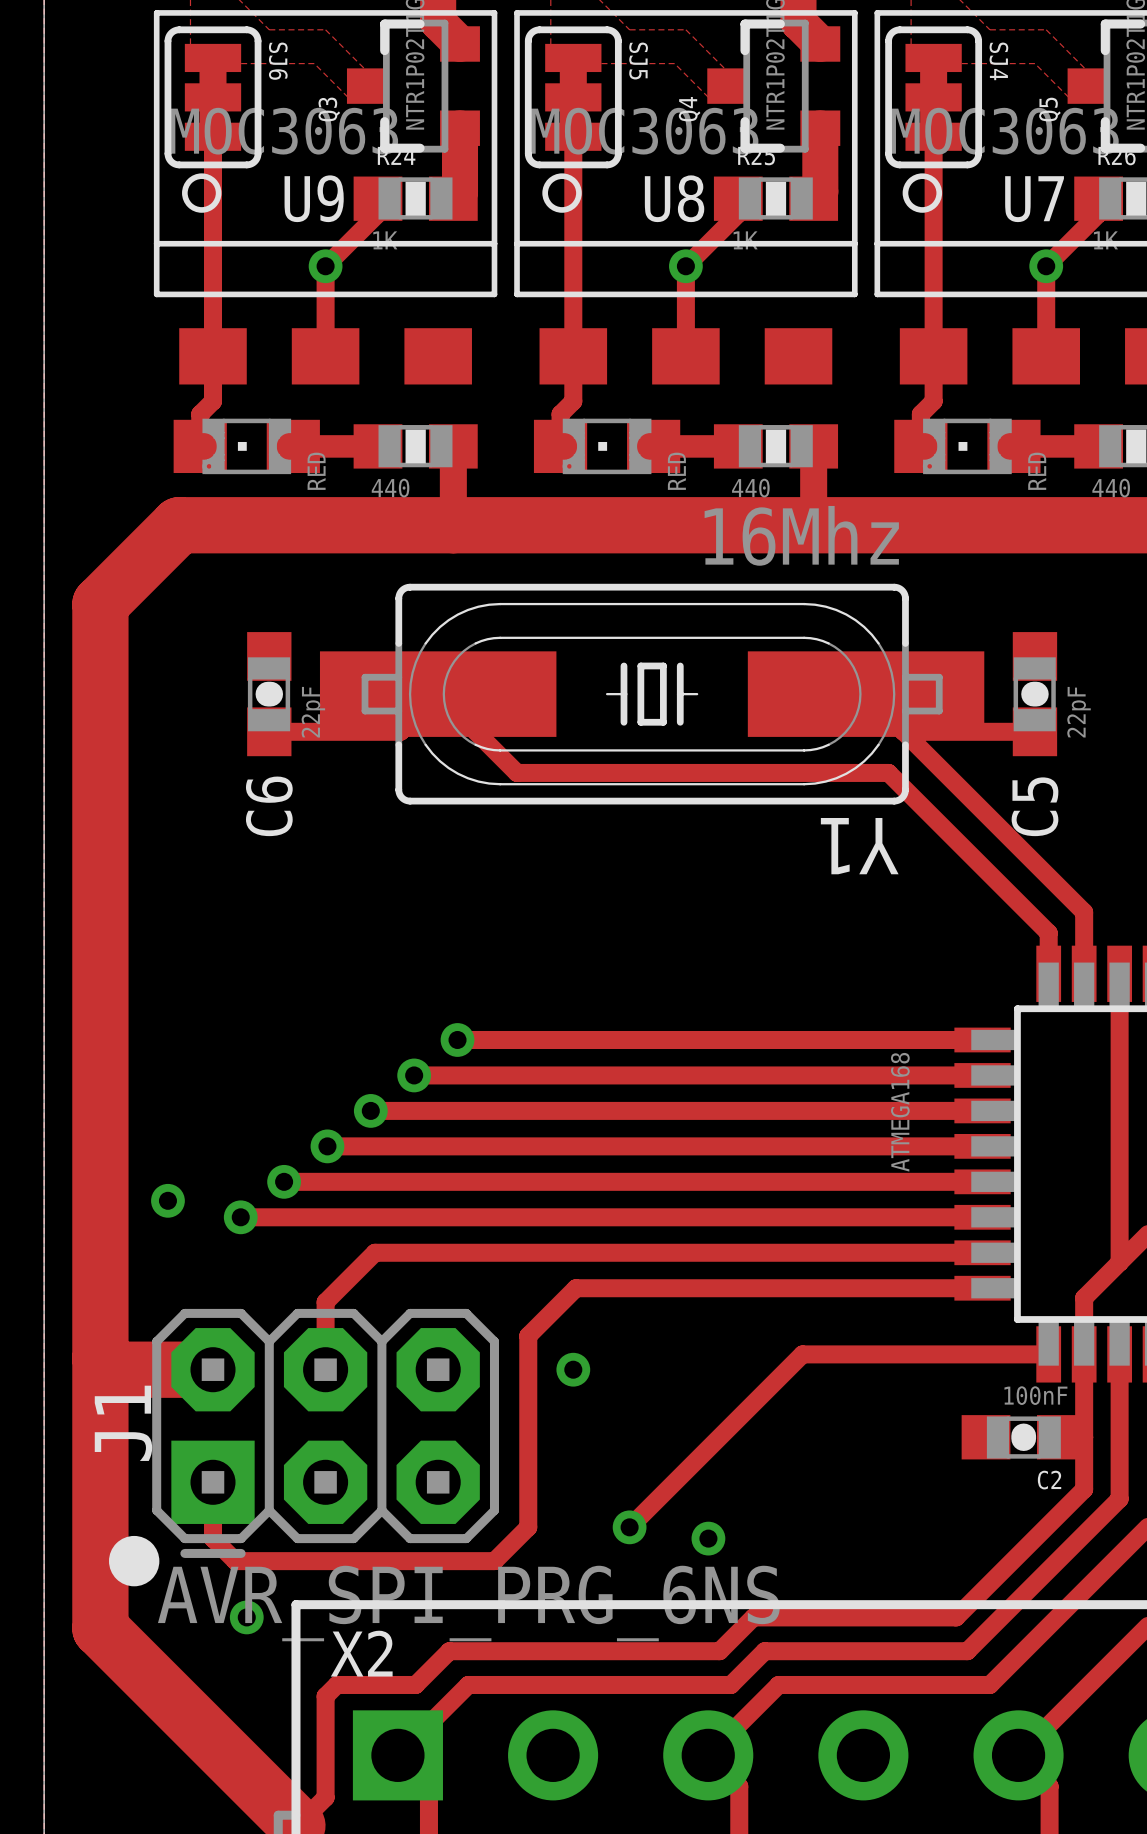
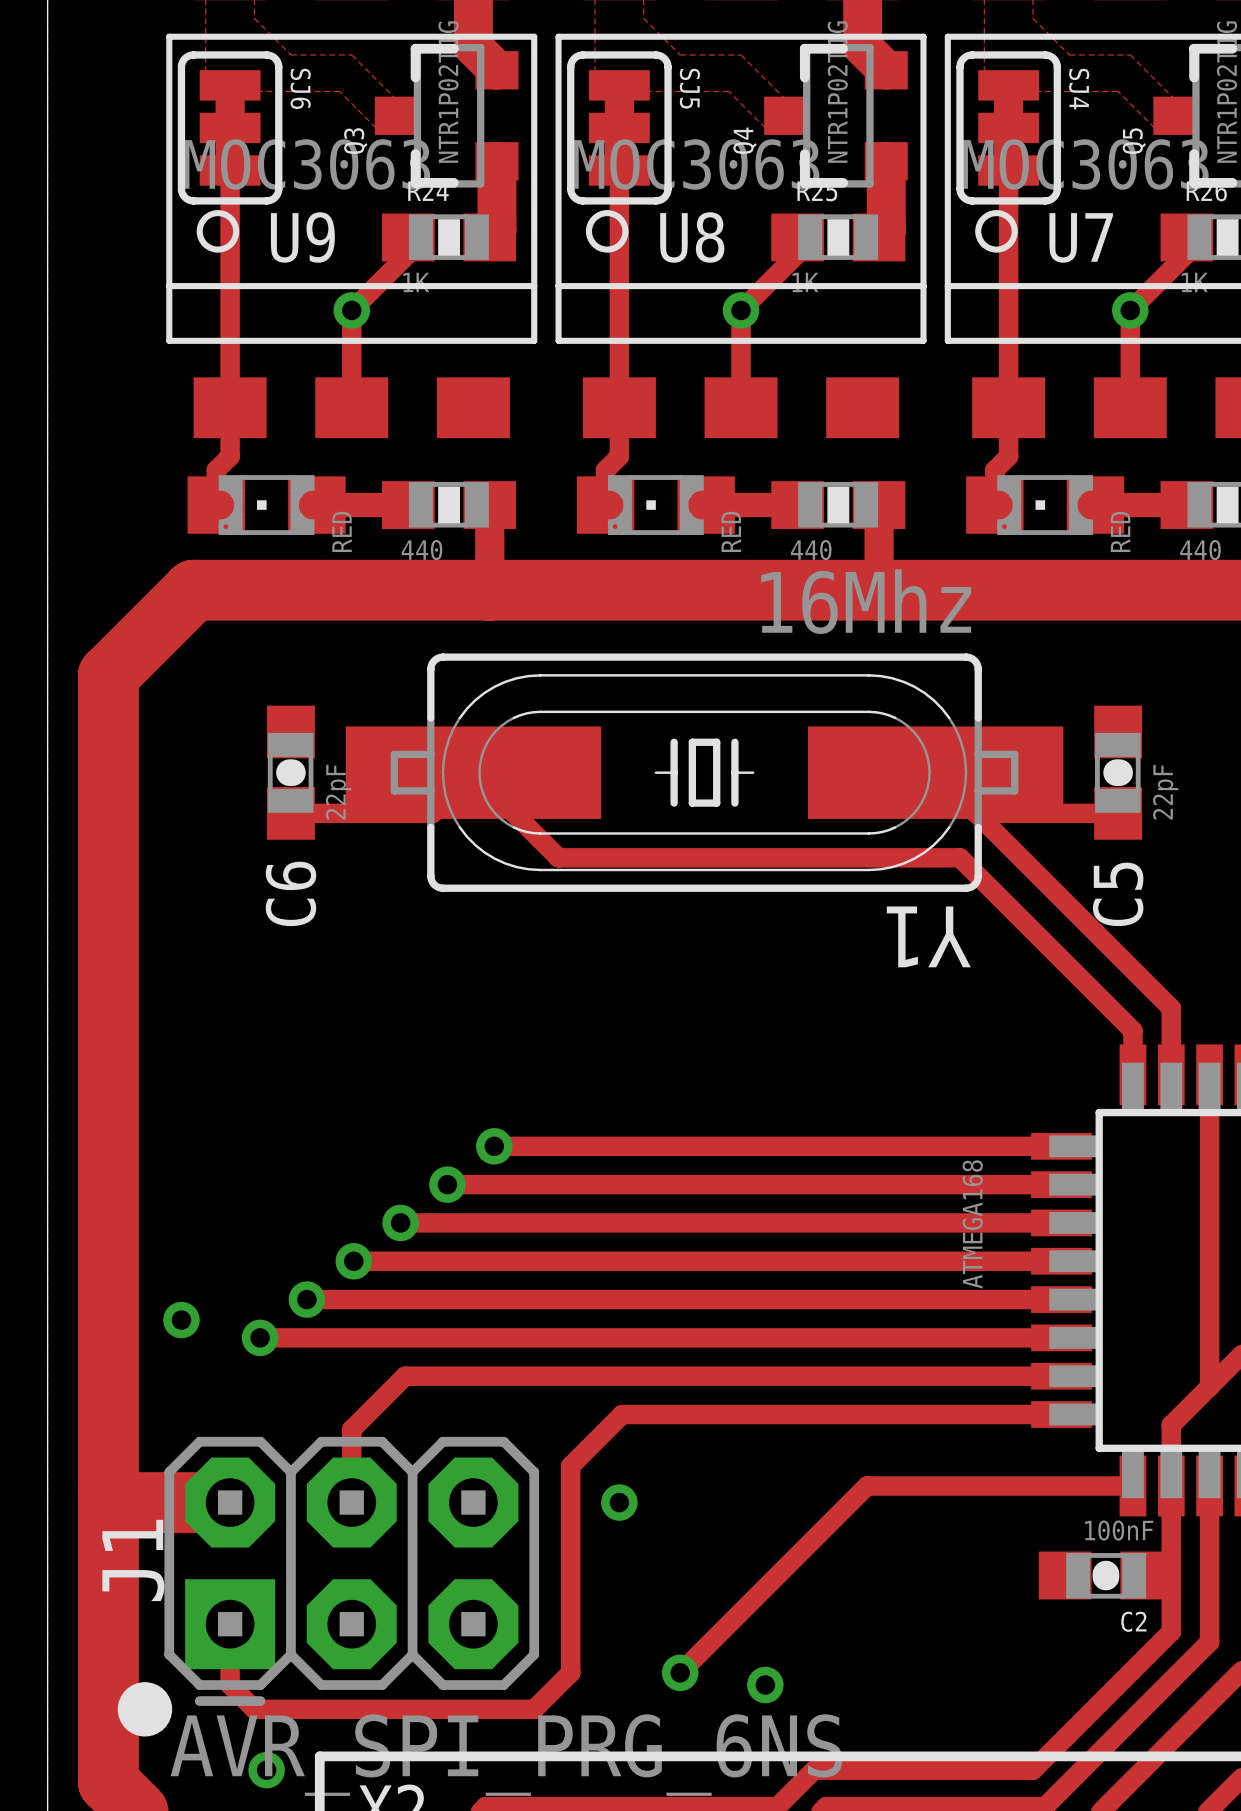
U9 name position: U9 (314, 198) -> U9 (302, 237)
U8 name position: U8 (674, 198) -> U8 (692, 237)
U7 name position: U7 (1034, 199) -> U7 (1081, 237)

